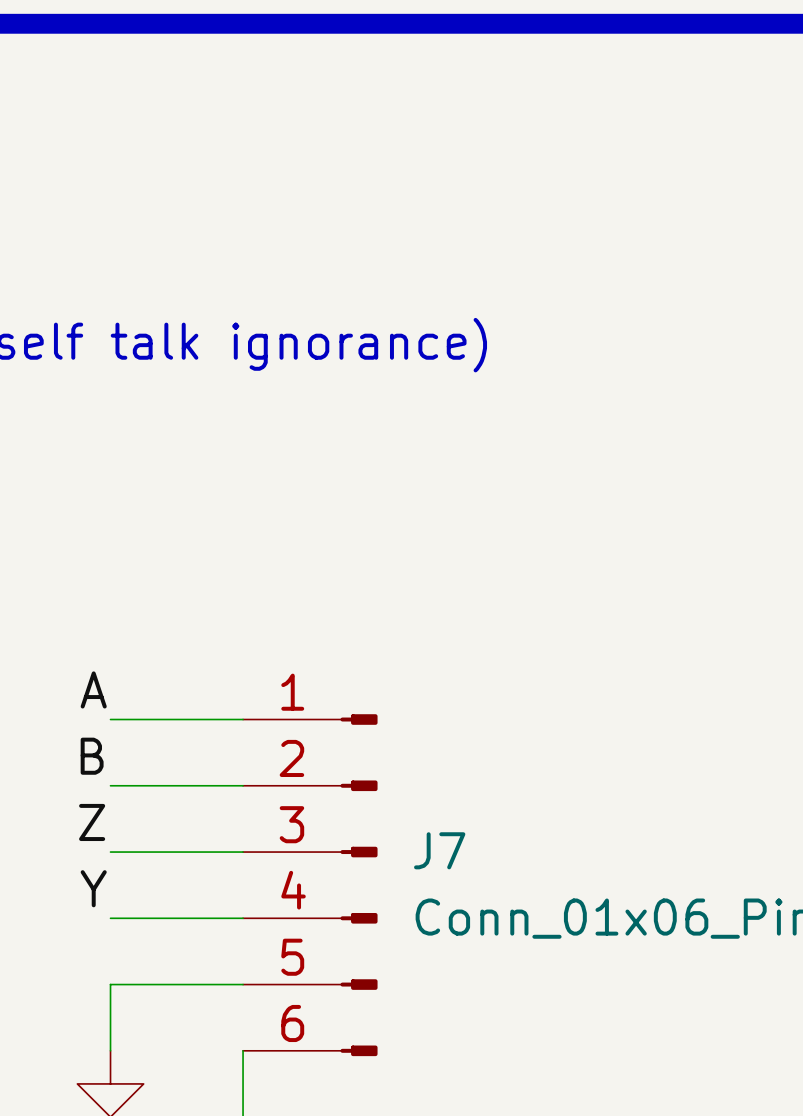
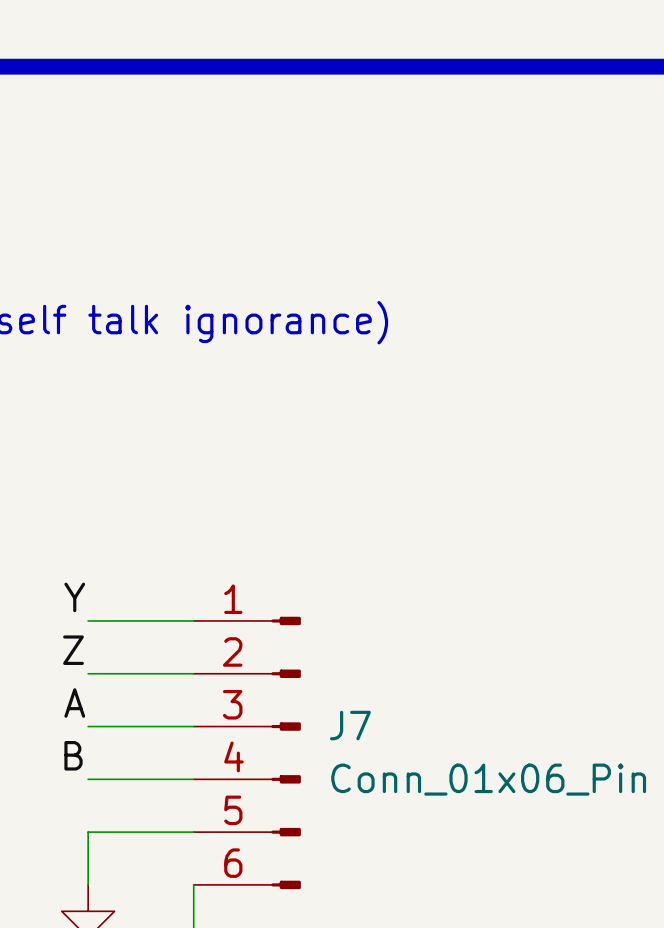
label: A (93, 689) -> Y (74, 597)
label: B (92, 756) -> Z (73, 650)
label: Z (92, 822) -> A (74, 702)
label: Y (93, 888) -> B (73, 755)

